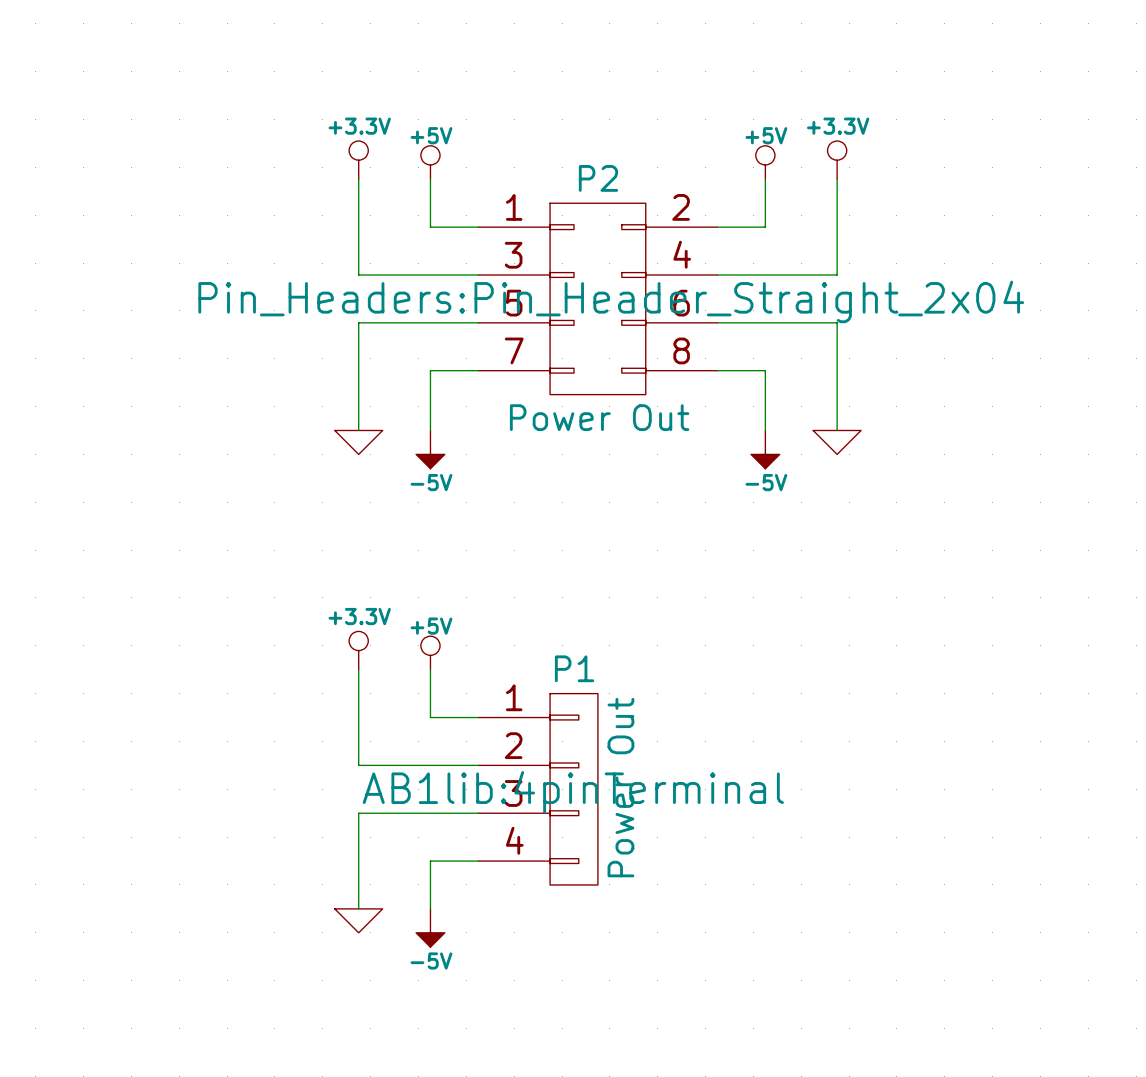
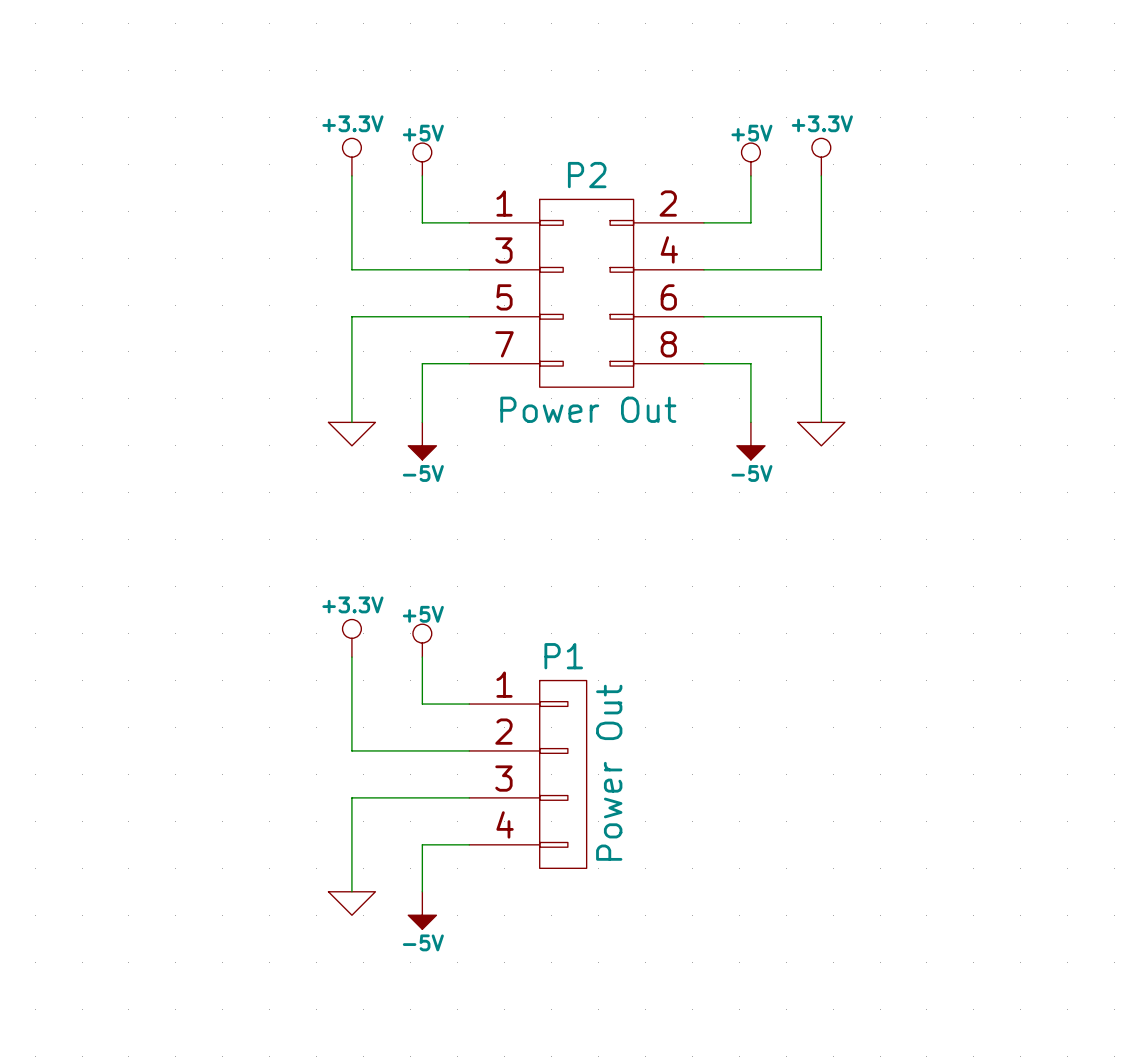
P2 text: Pin_Headers:Pin_Header_Straight_2x04 (611, 301) -> none
P1 text: AB1lib:4pinTerminal (573, 792) -> none

